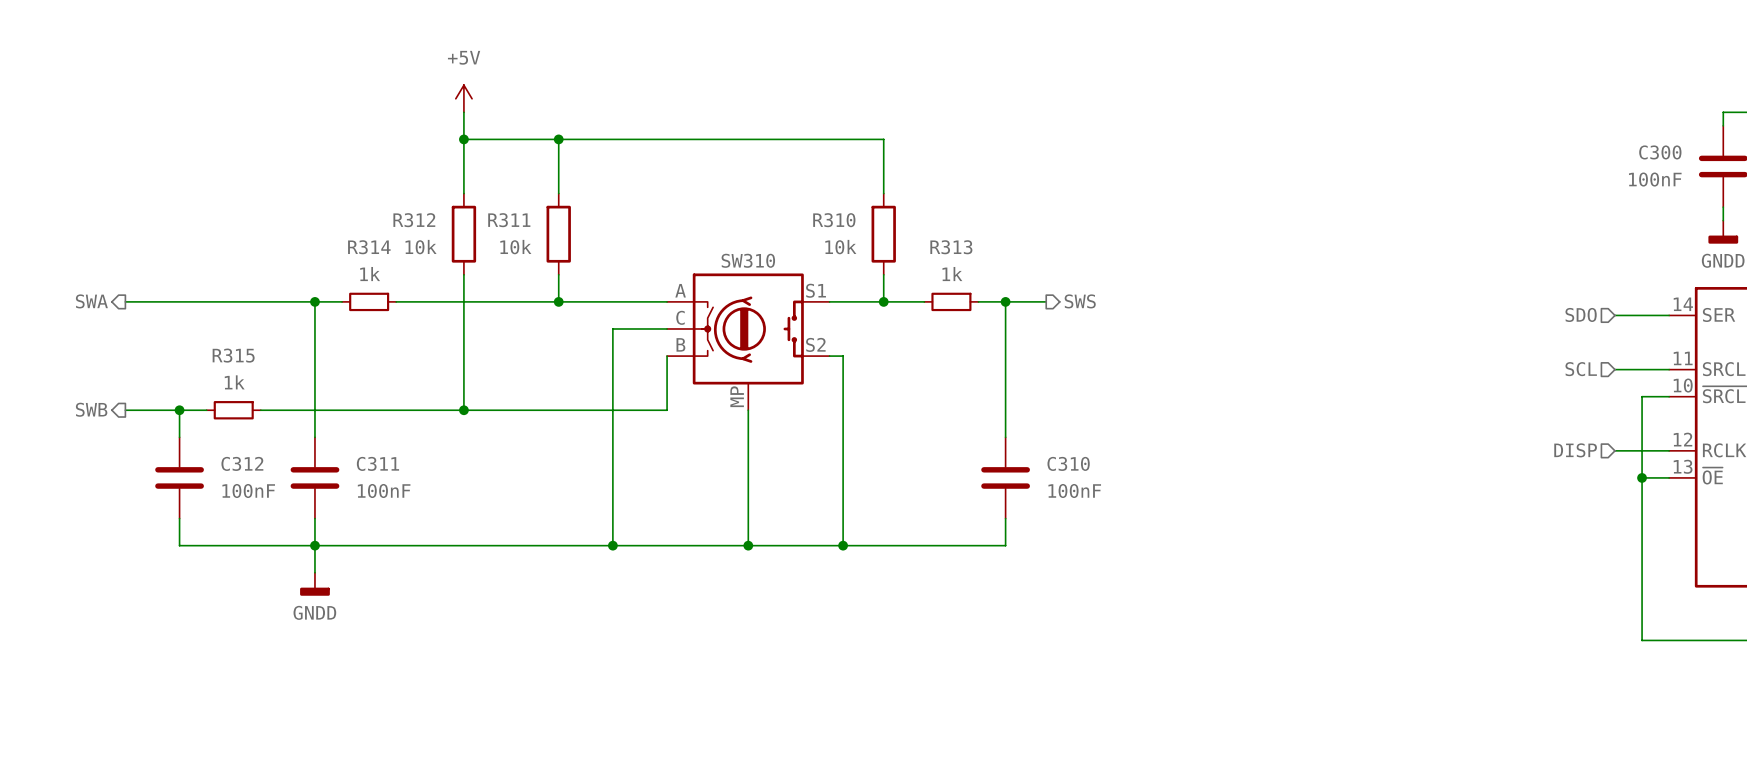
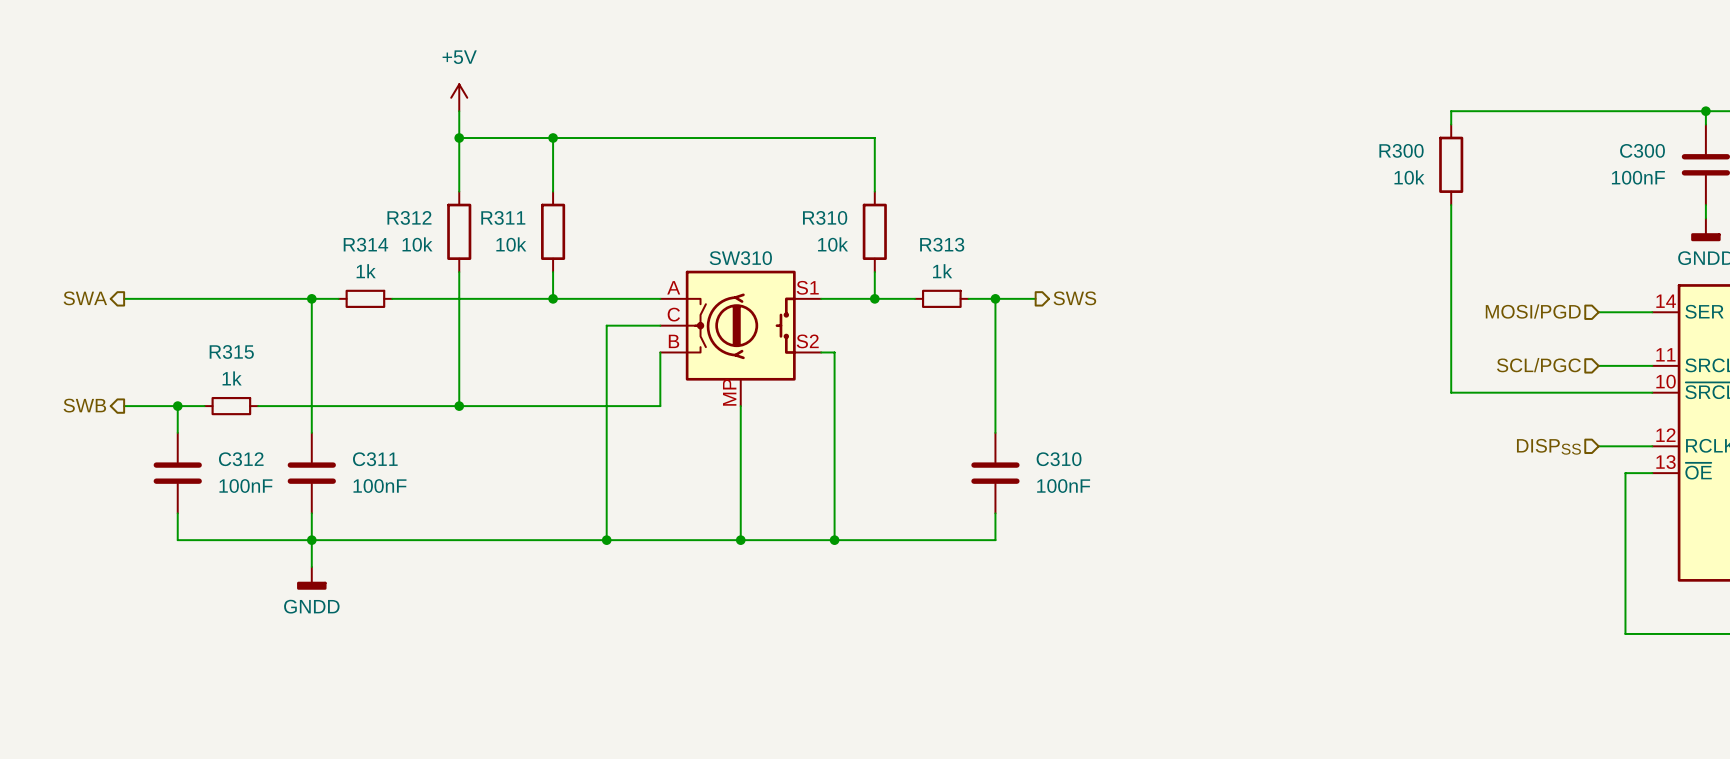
wire: none -> (1705, 111) (1451, 111) (1451, 124)
junction: none -> (1705, 111)
R300: none -> 10k (1451, 164)
hierarchical label: SDO (1581, 314) -> MOSI/PGD (1533, 311)
hierarchical label: SCL (1581, 369) -> SCL/PGC (1538, 365)
wire: (1642, 396) (1642, 477) -> (1625, 392) (1451, 392) (1451, 205)
hierarchical label: DISP (1575, 450) -> DISPSS (1548, 446)
junction: (1642, 477) -> none

